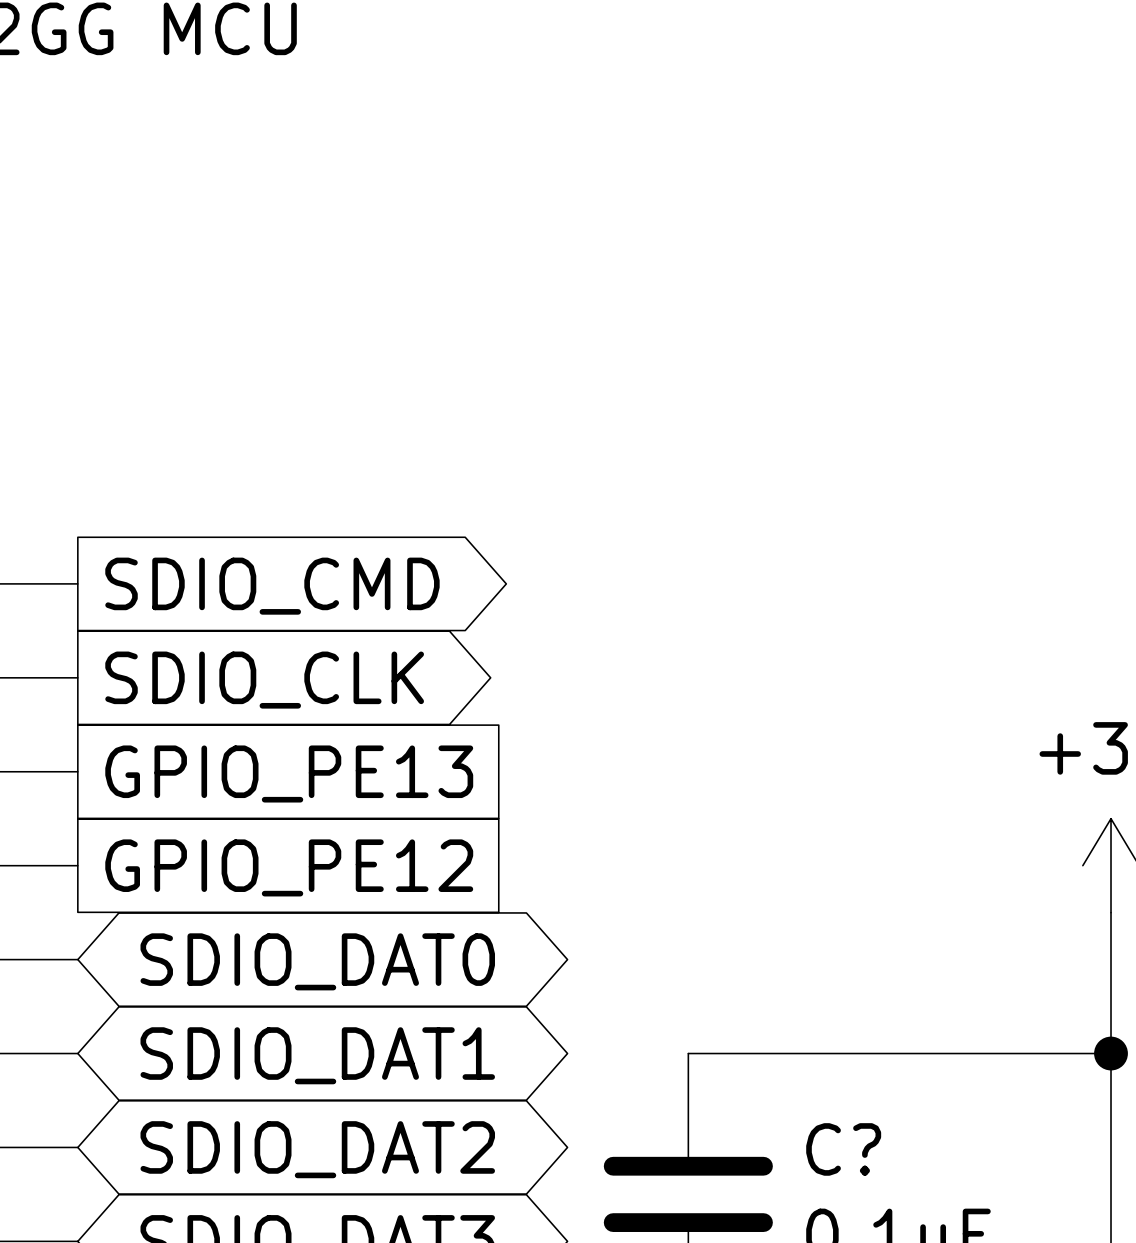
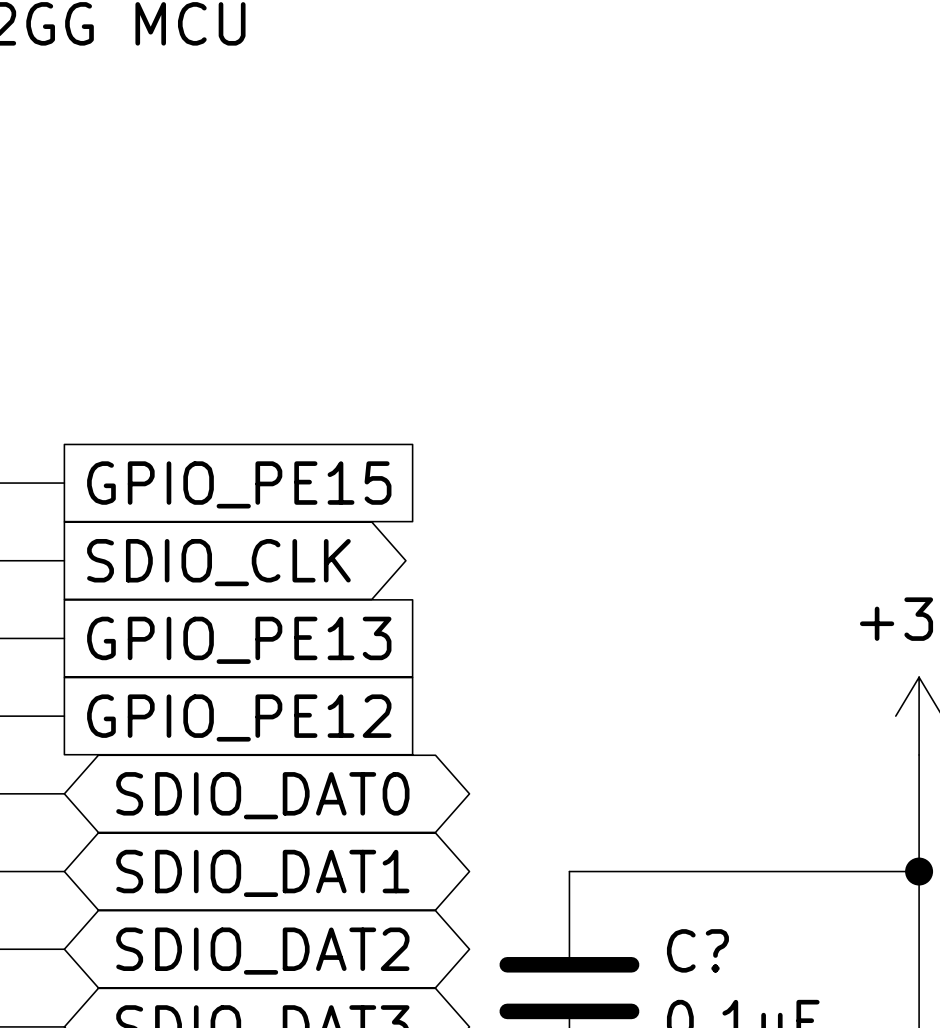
global label shape: output (272, 586) -> passive (239, 484)
global label: SDIO_CMD (272, 586) -> GPIO_PE15 (239, 484)

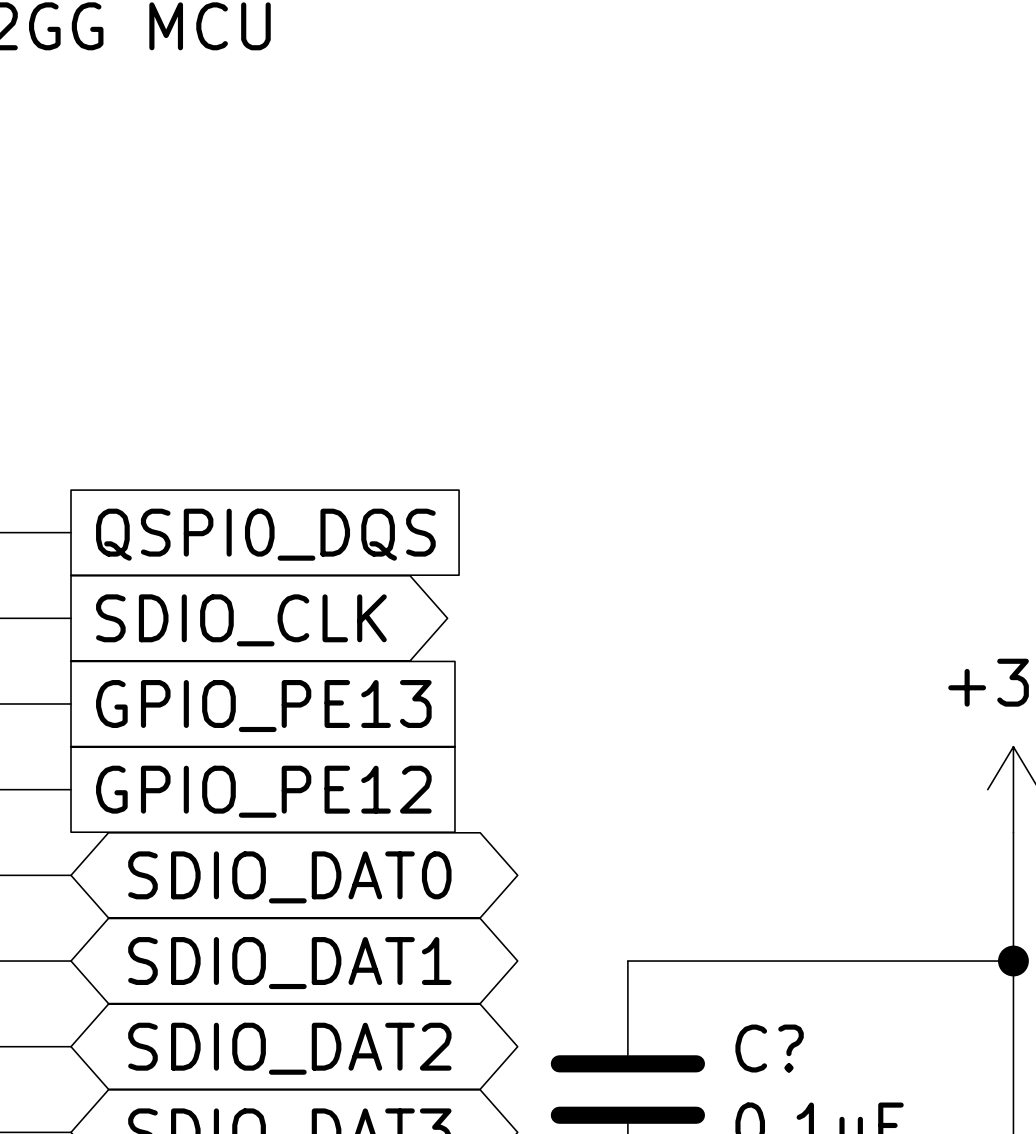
global label: GPIO_PE15 (239, 484) -> QSPI0_DQS (265, 534)

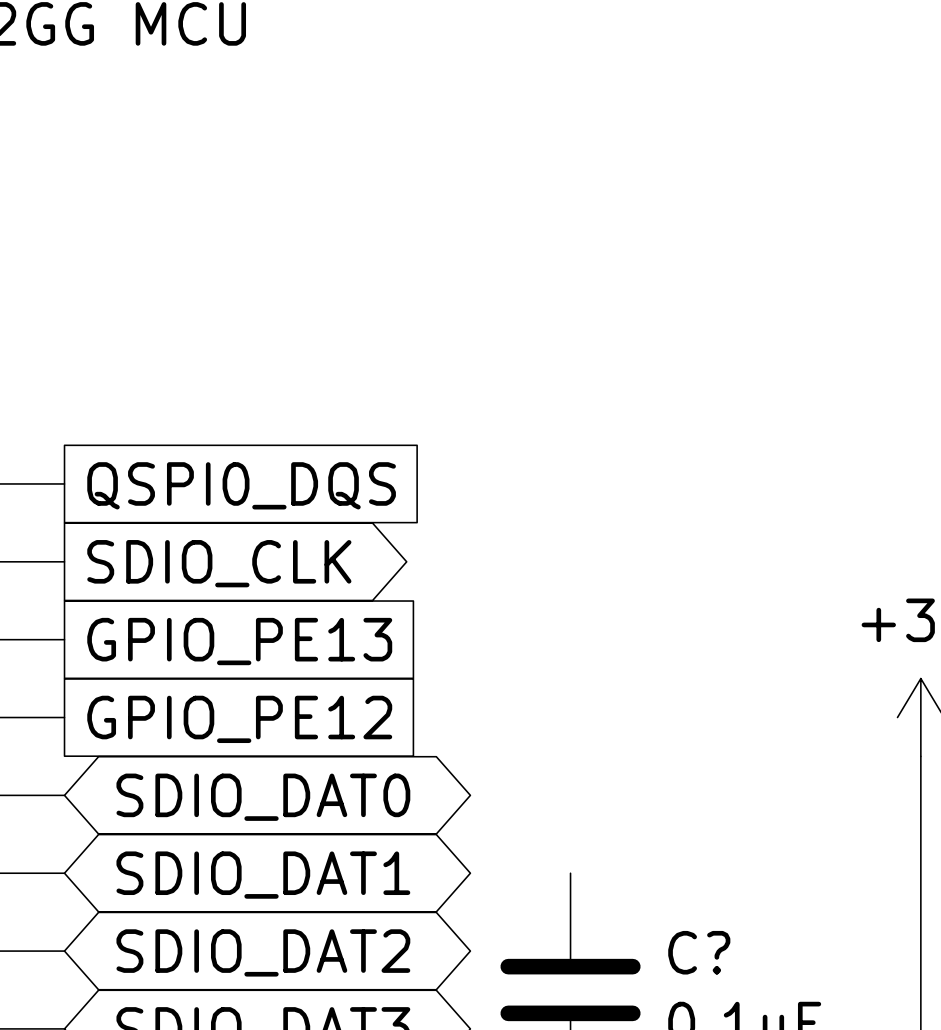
wire: (627, 961) (1013, 961) -> none
junction: (1013, 961) -> none

